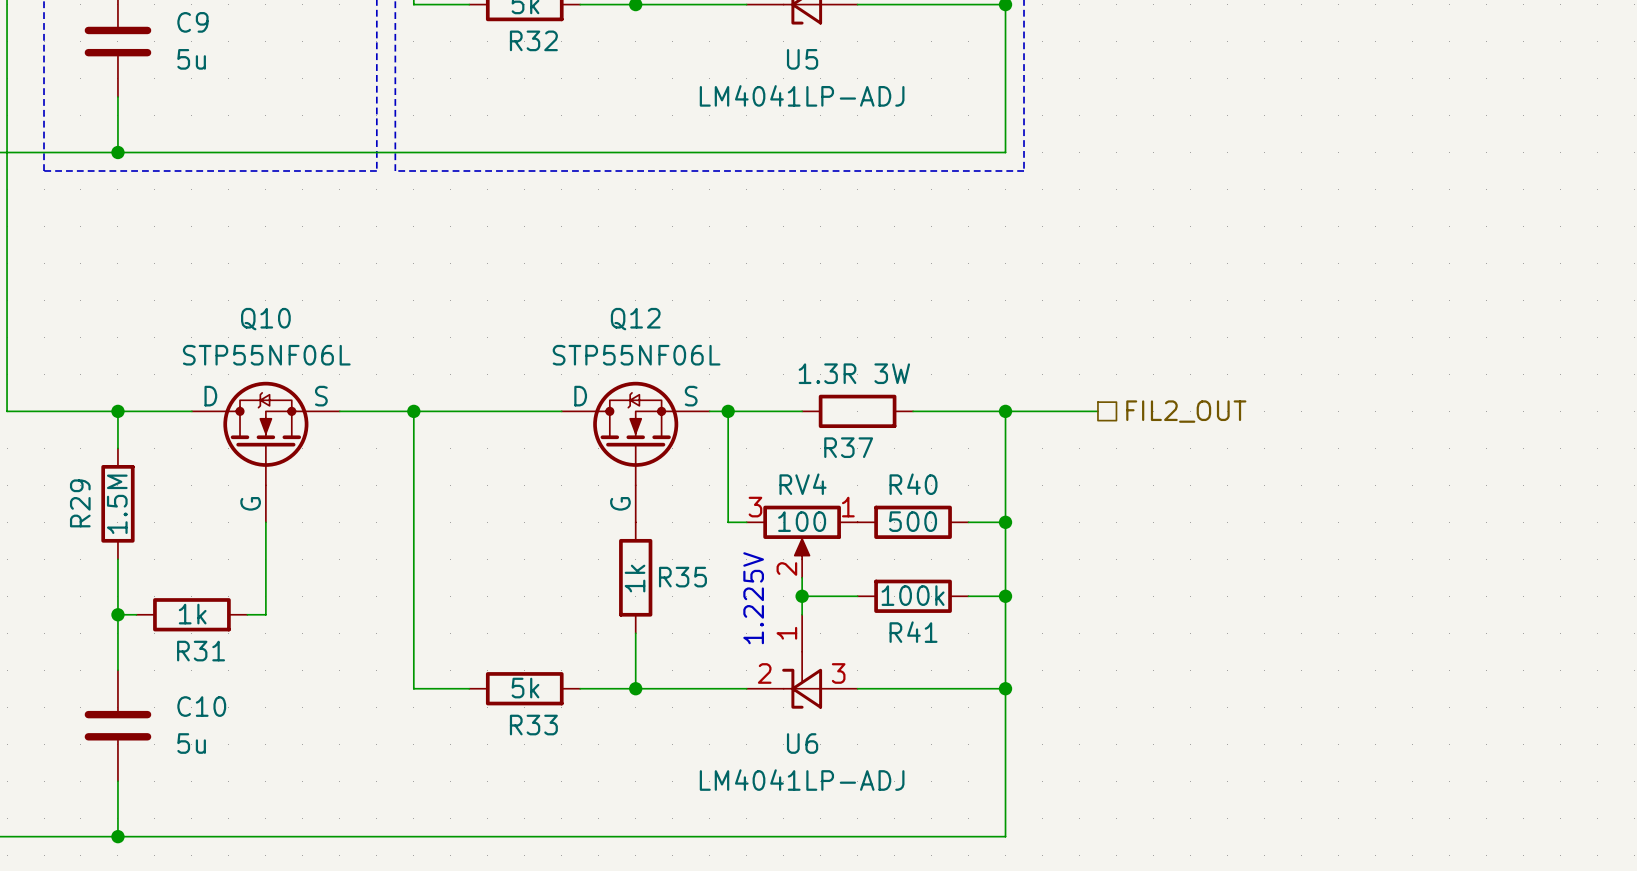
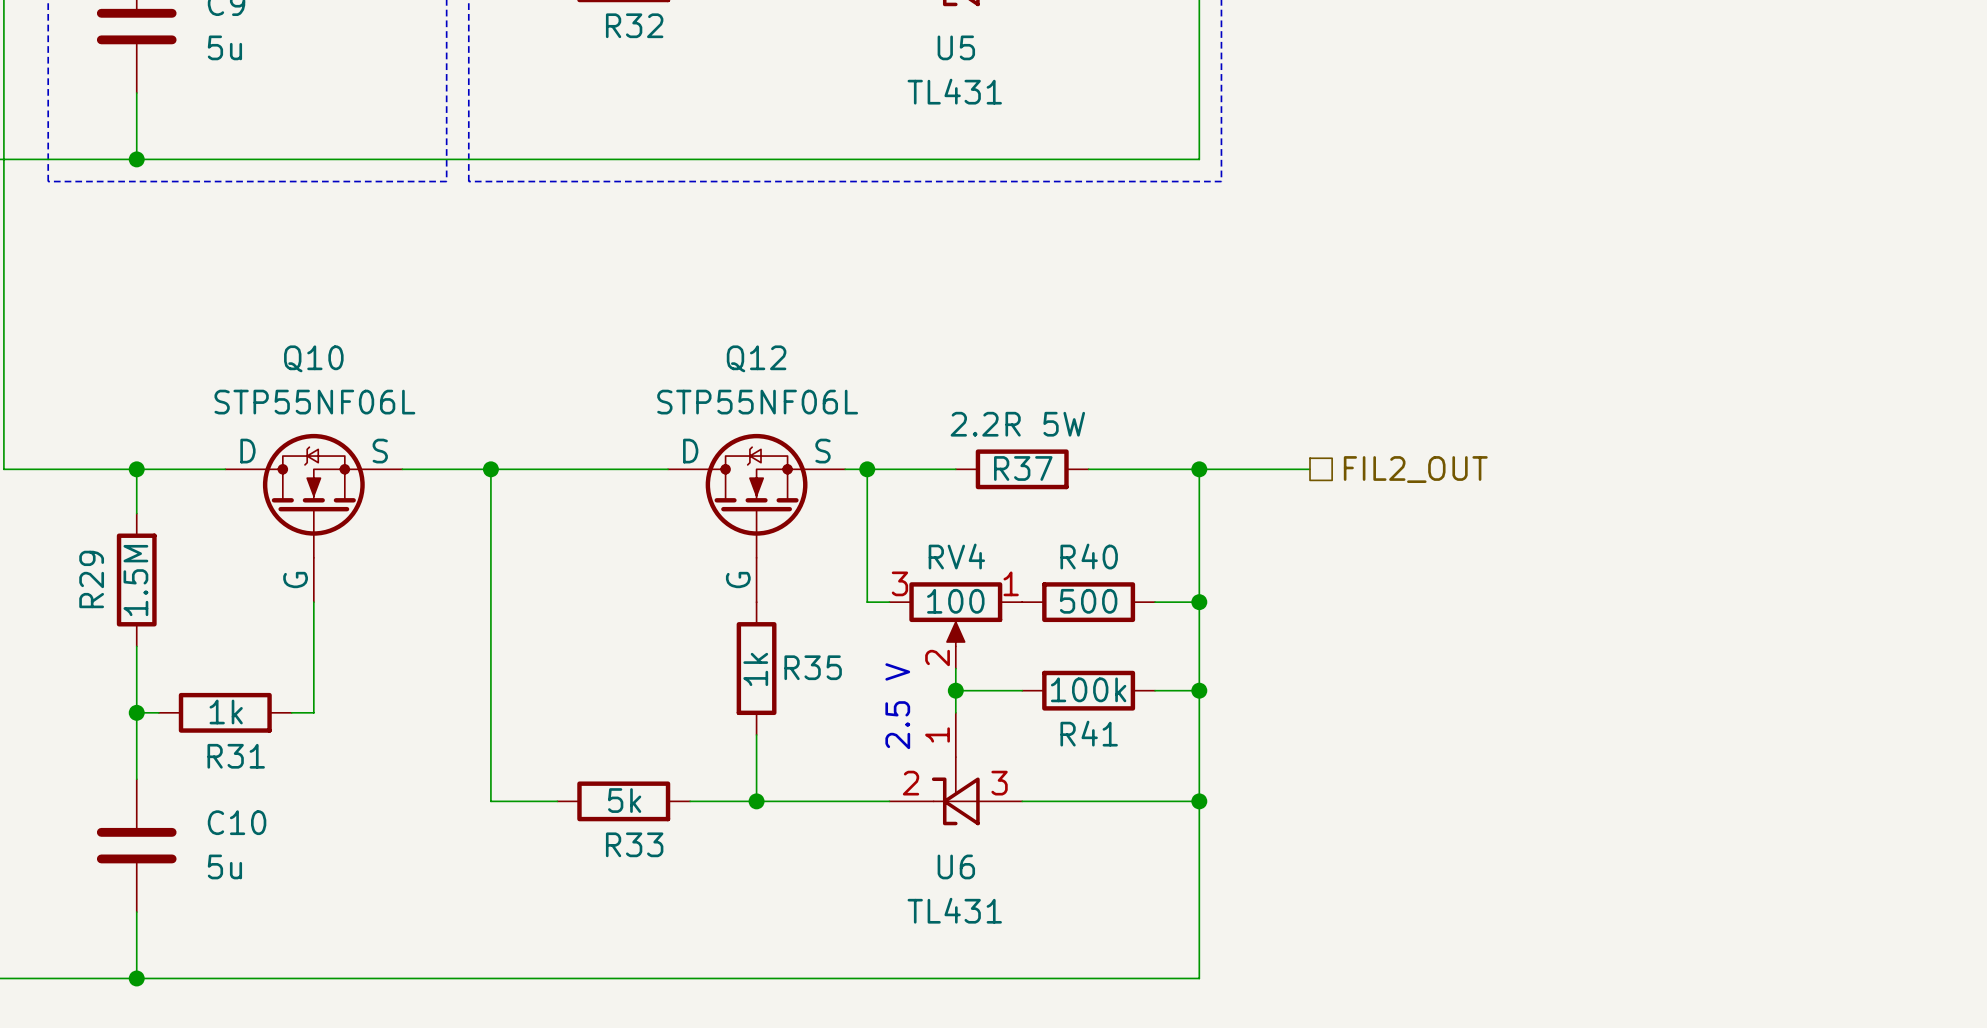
U5 value: LM4041LP-ADJ (802, 95) -> TL431 (954, 91)
R37 value: 1.3R 3W (854, 373) -> 2.2R 5W (1017, 424)
R37 name position: R37 (848, 447) -> R37 (1023, 468)
text: 1.225V (753, 598) -> 2.5 V (897, 706)
U6 value: LM4041LP-ADJ (802, 780) -> TL431 (954, 910)

